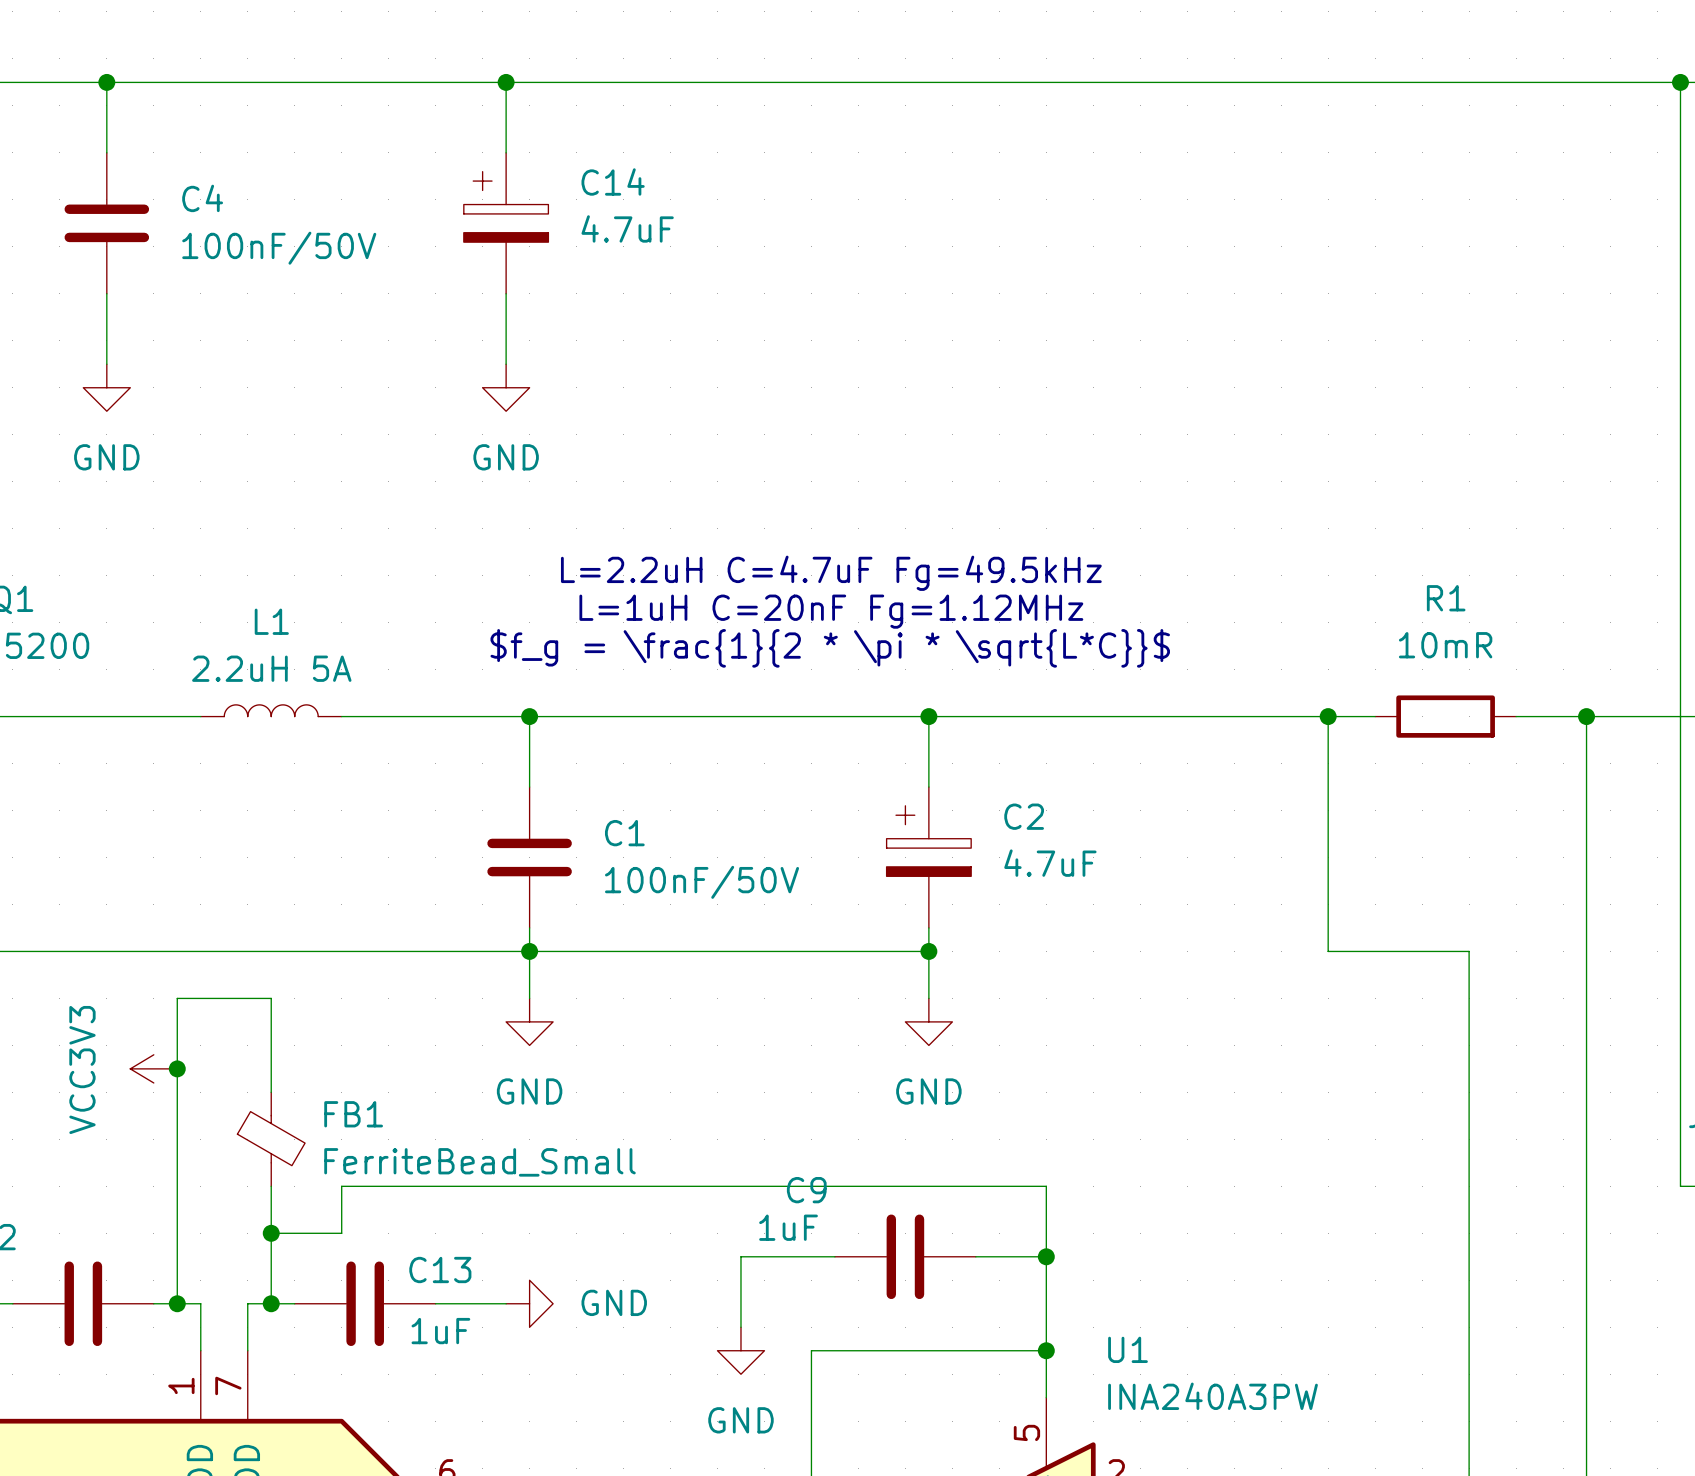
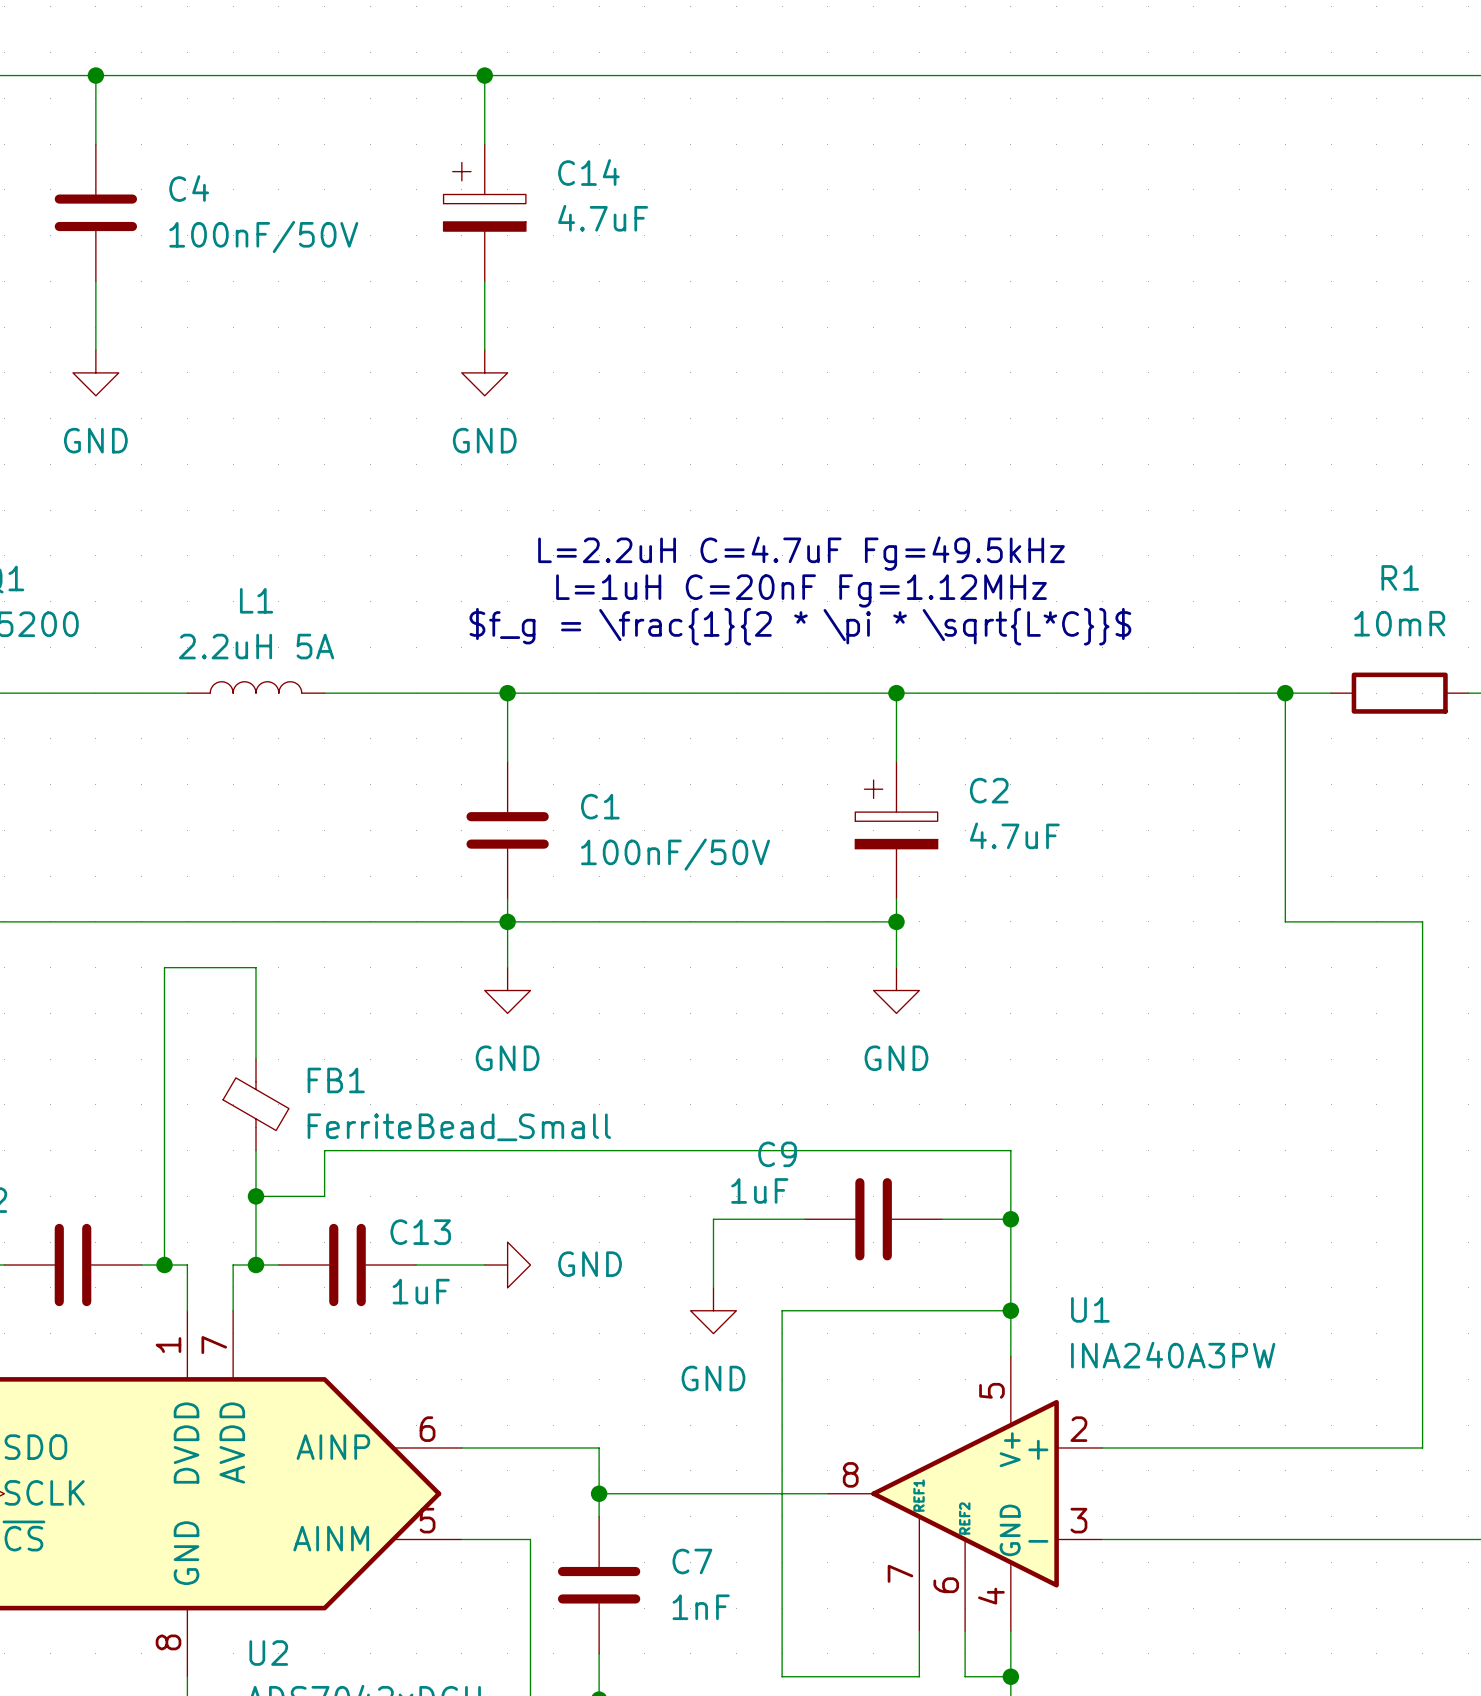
power symbol: VCC3V3 (153, 1068) -> none
junction: (177, 1068) -> none

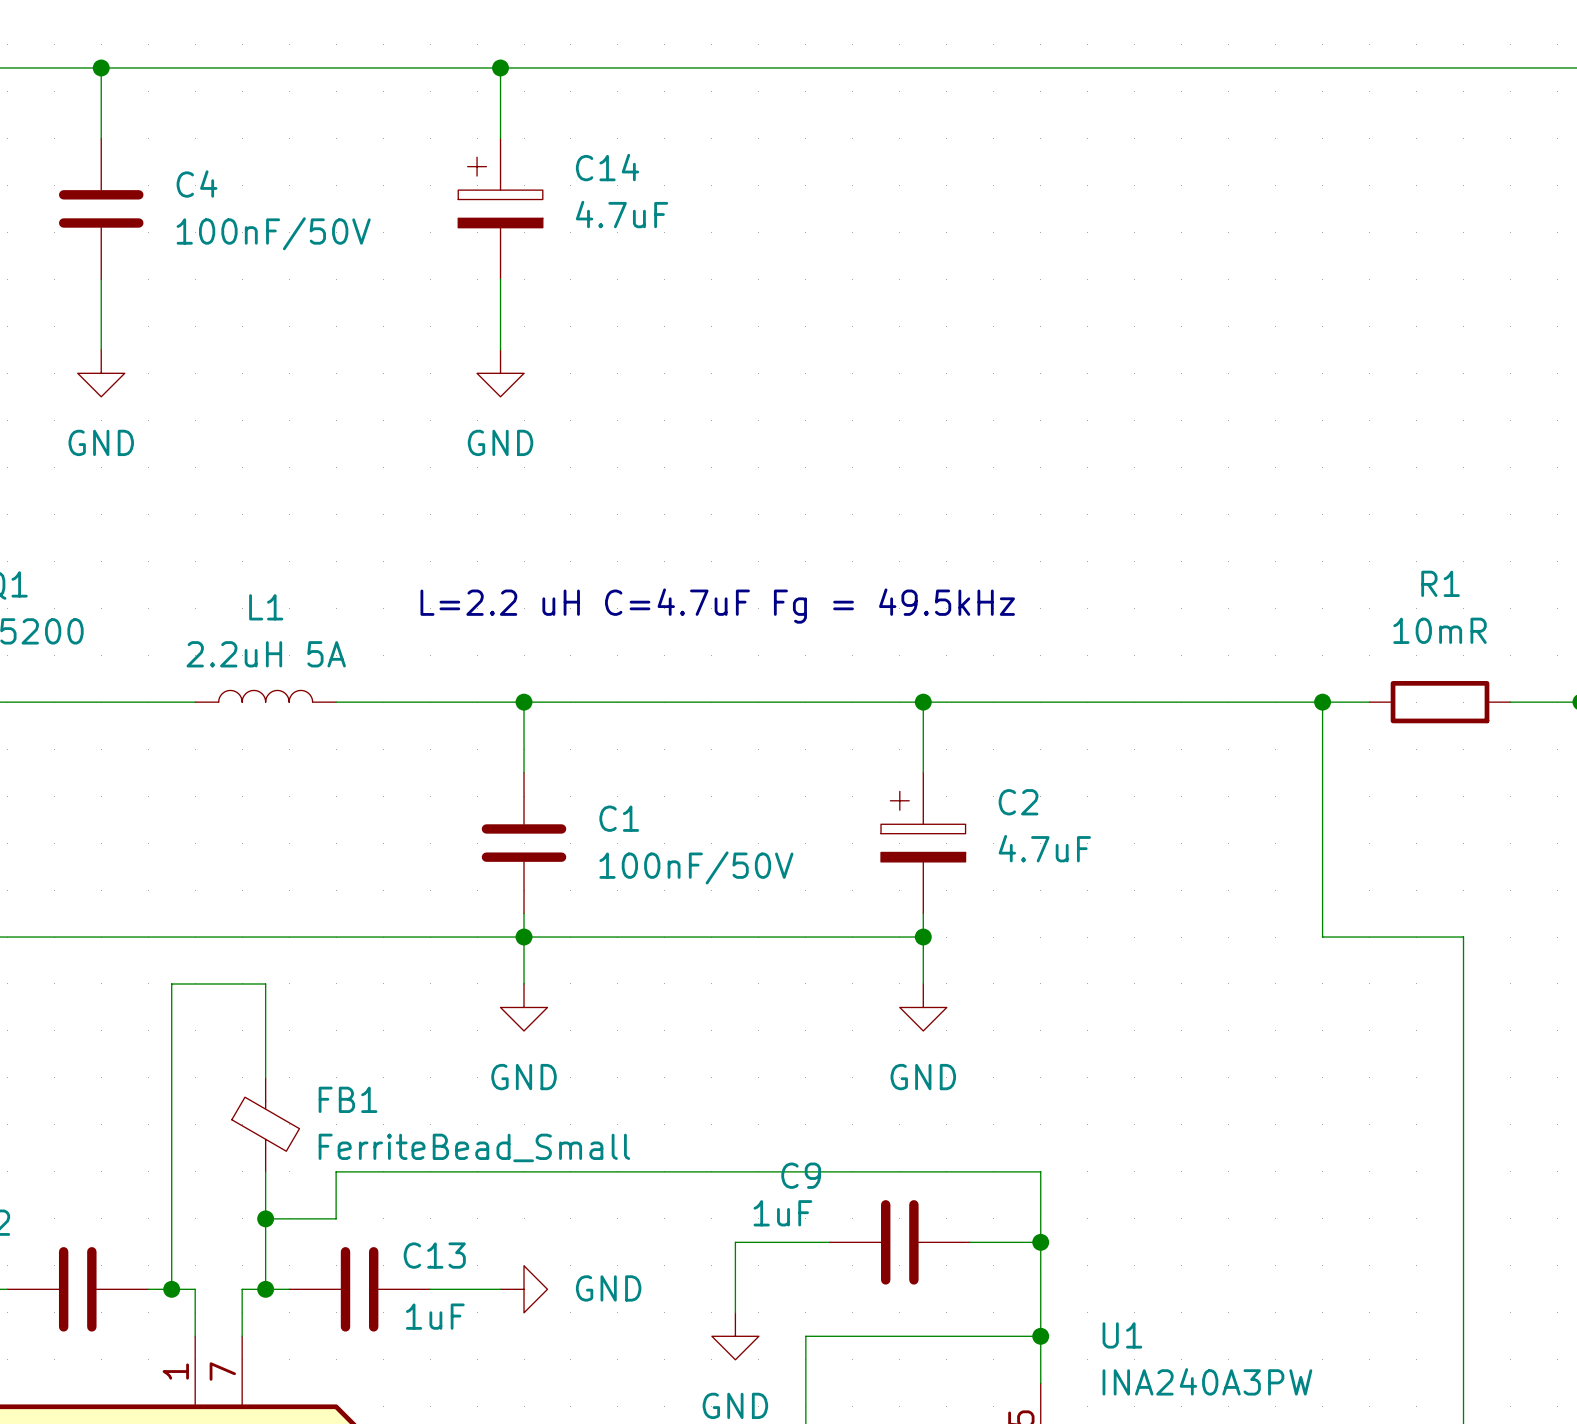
text: L=2.2uH C=4.7uF Fg=49.5kHz (801, 553) -> L=2.2 uH C=4.7uF Fg = 49.5kHz (717, 606)
text: L=1uH C=20nF Fg=1.12MHz (801, 590) -> none
text: $f_g = \frac{1}{2 * \pi * \sqrt{L*C}}$ (800, 626) -> none

